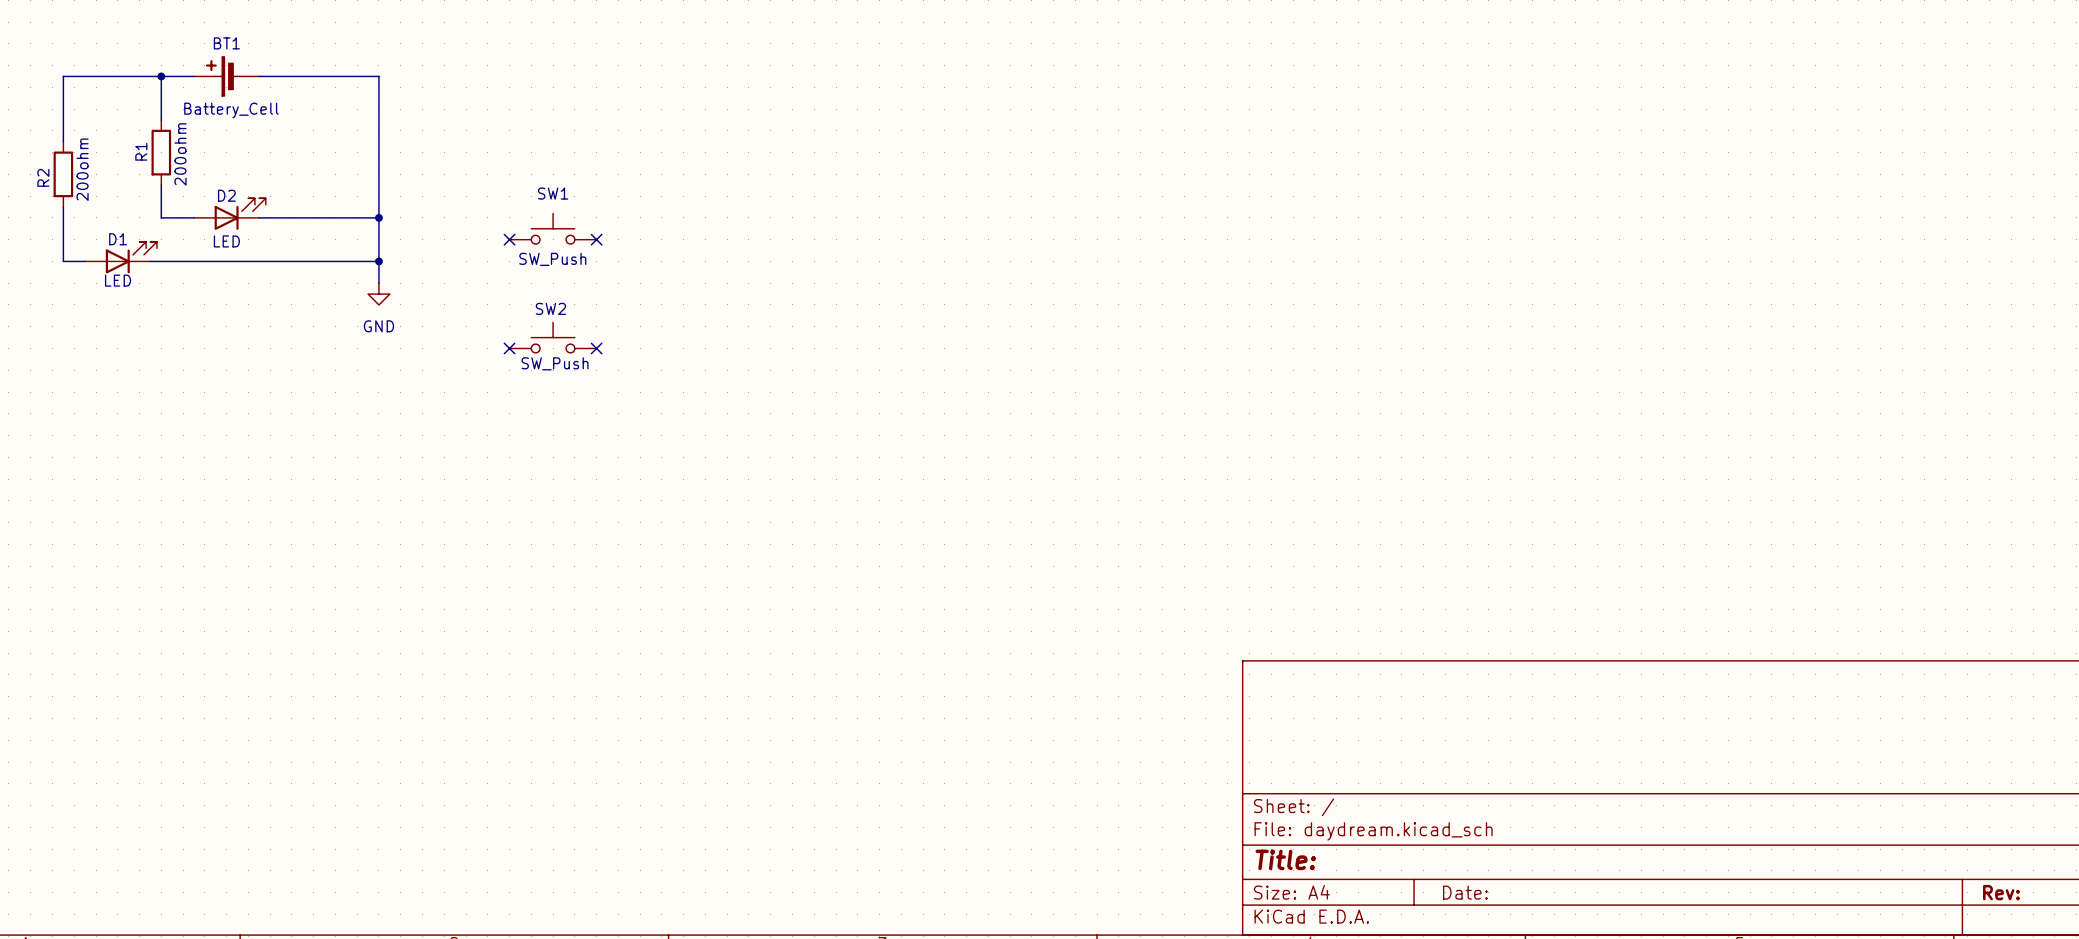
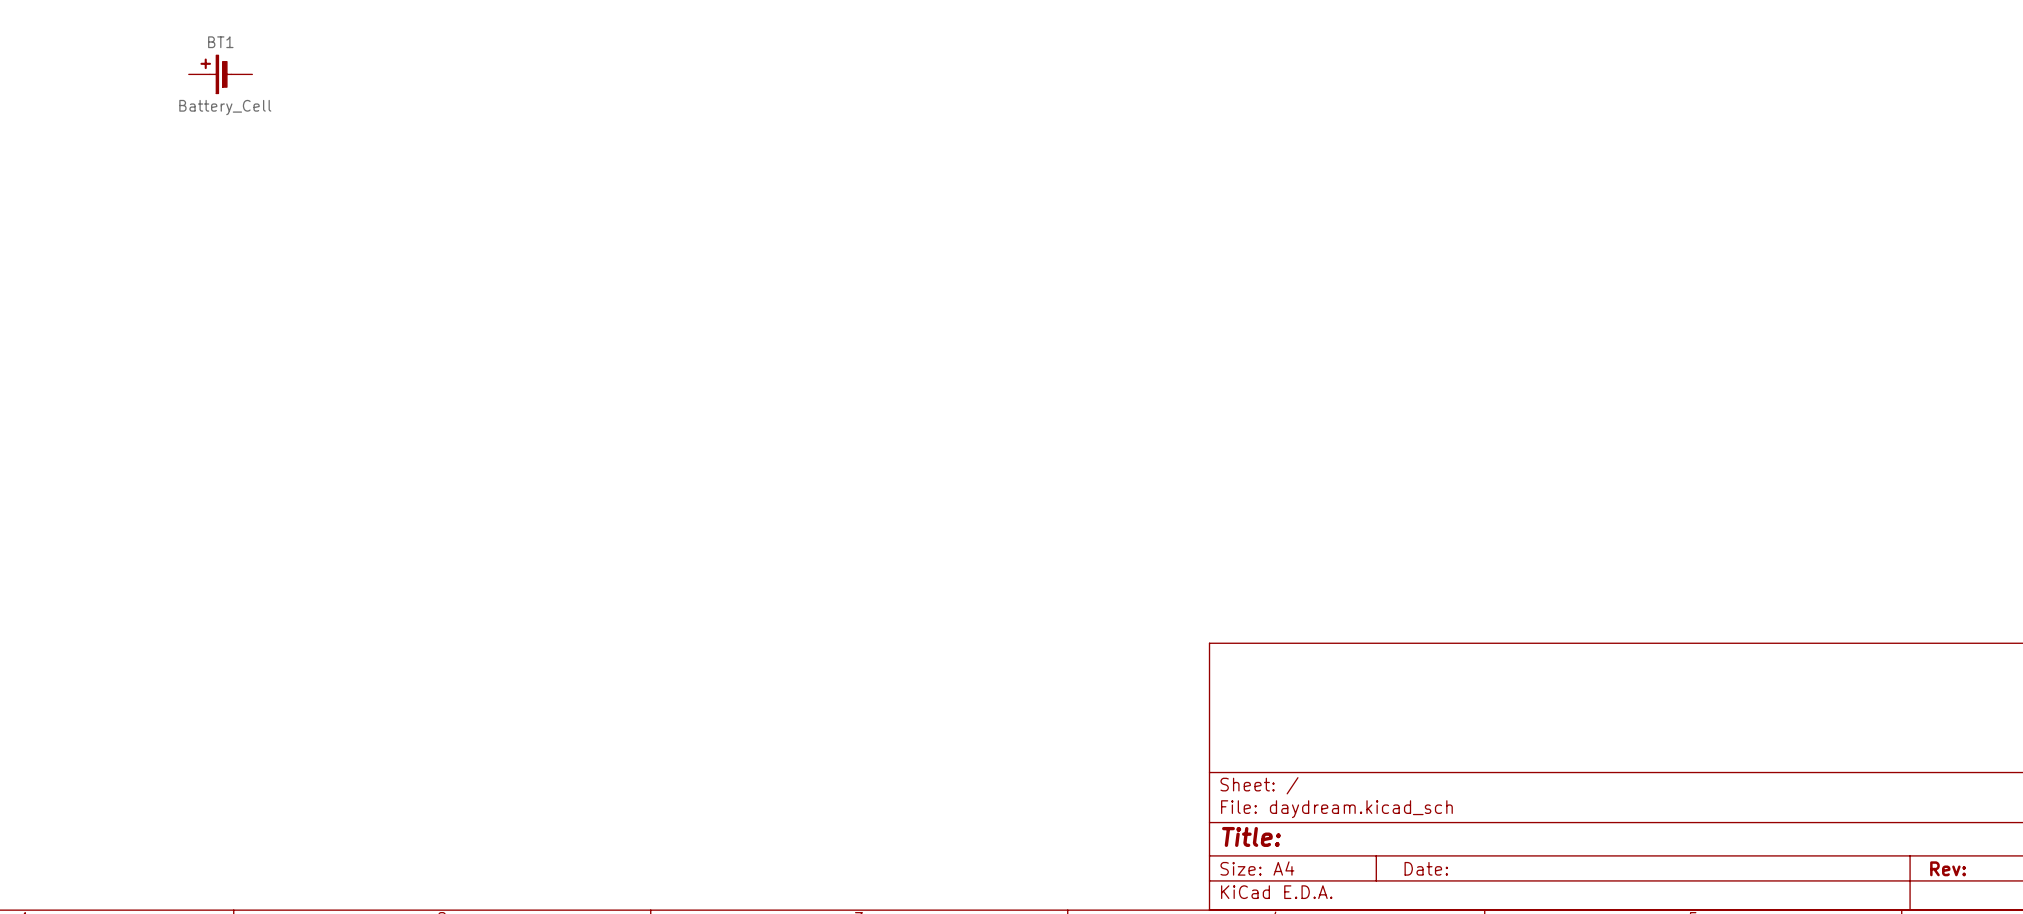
wire: (161, 76) (161, 119) -> none
junction: (161, 76) -> none
wire: (193, 76) (63, 76) (63, 141) -> none
wire: (259, 76) (378, 76) (378, 283) -> none
R1: 200ohm (161, 152) -> none
R2: 200ohm (63, 174) -> none
wire: (161, 185) (161, 217) (193, 217) -> none
wire: (63, 207) (63, 261) (85, 261) -> none
D2: LED (229, 214) -> none
wire: (259, 217) (378, 217) -> none
junction: (378, 217) -> none
SW1: SW_Push (553, 228) -> none
no-connect mark: (509, 239) -> none
no-connect mark: (596, 239) -> none
D1: LED (121, 257) -> none
wire: (150, 261) (378, 261) -> none
junction: (378, 261) -> none
power symbol: GND (378, 294) -> none
SW2: SW_Push (553, 337) -> none
no-connect mark: (509, 348) -> none
no-connect mark: (596, 348) -> none

